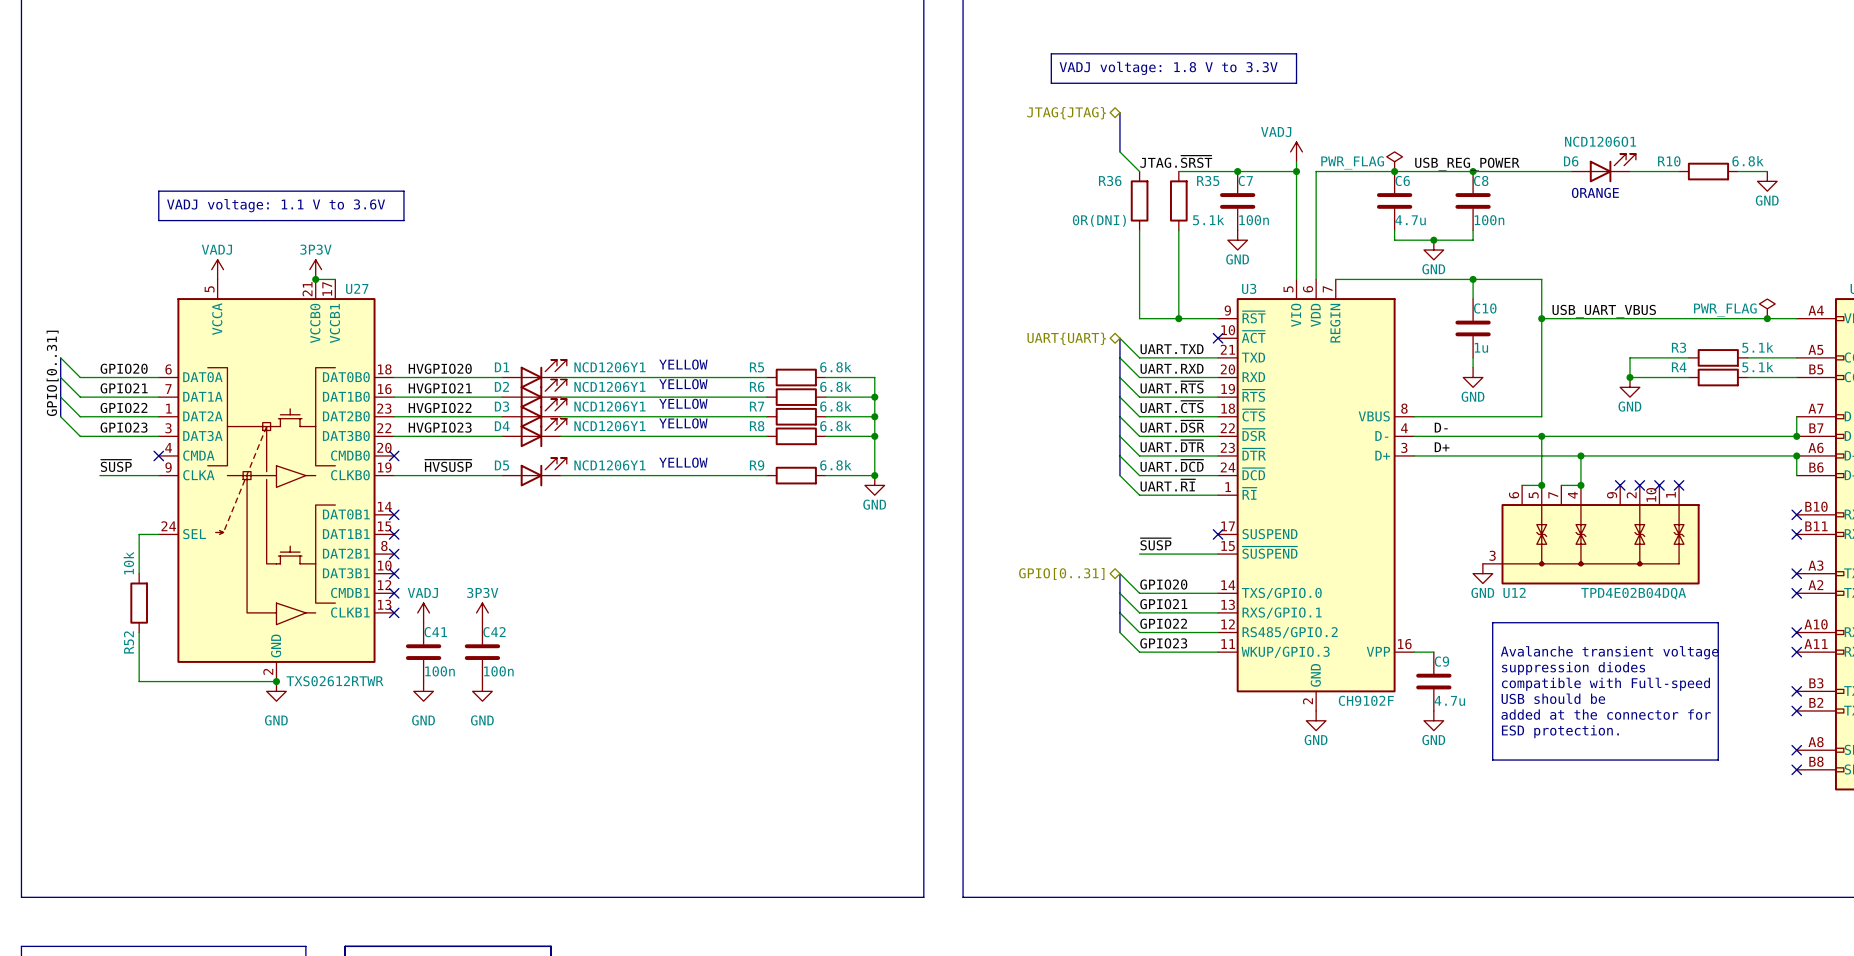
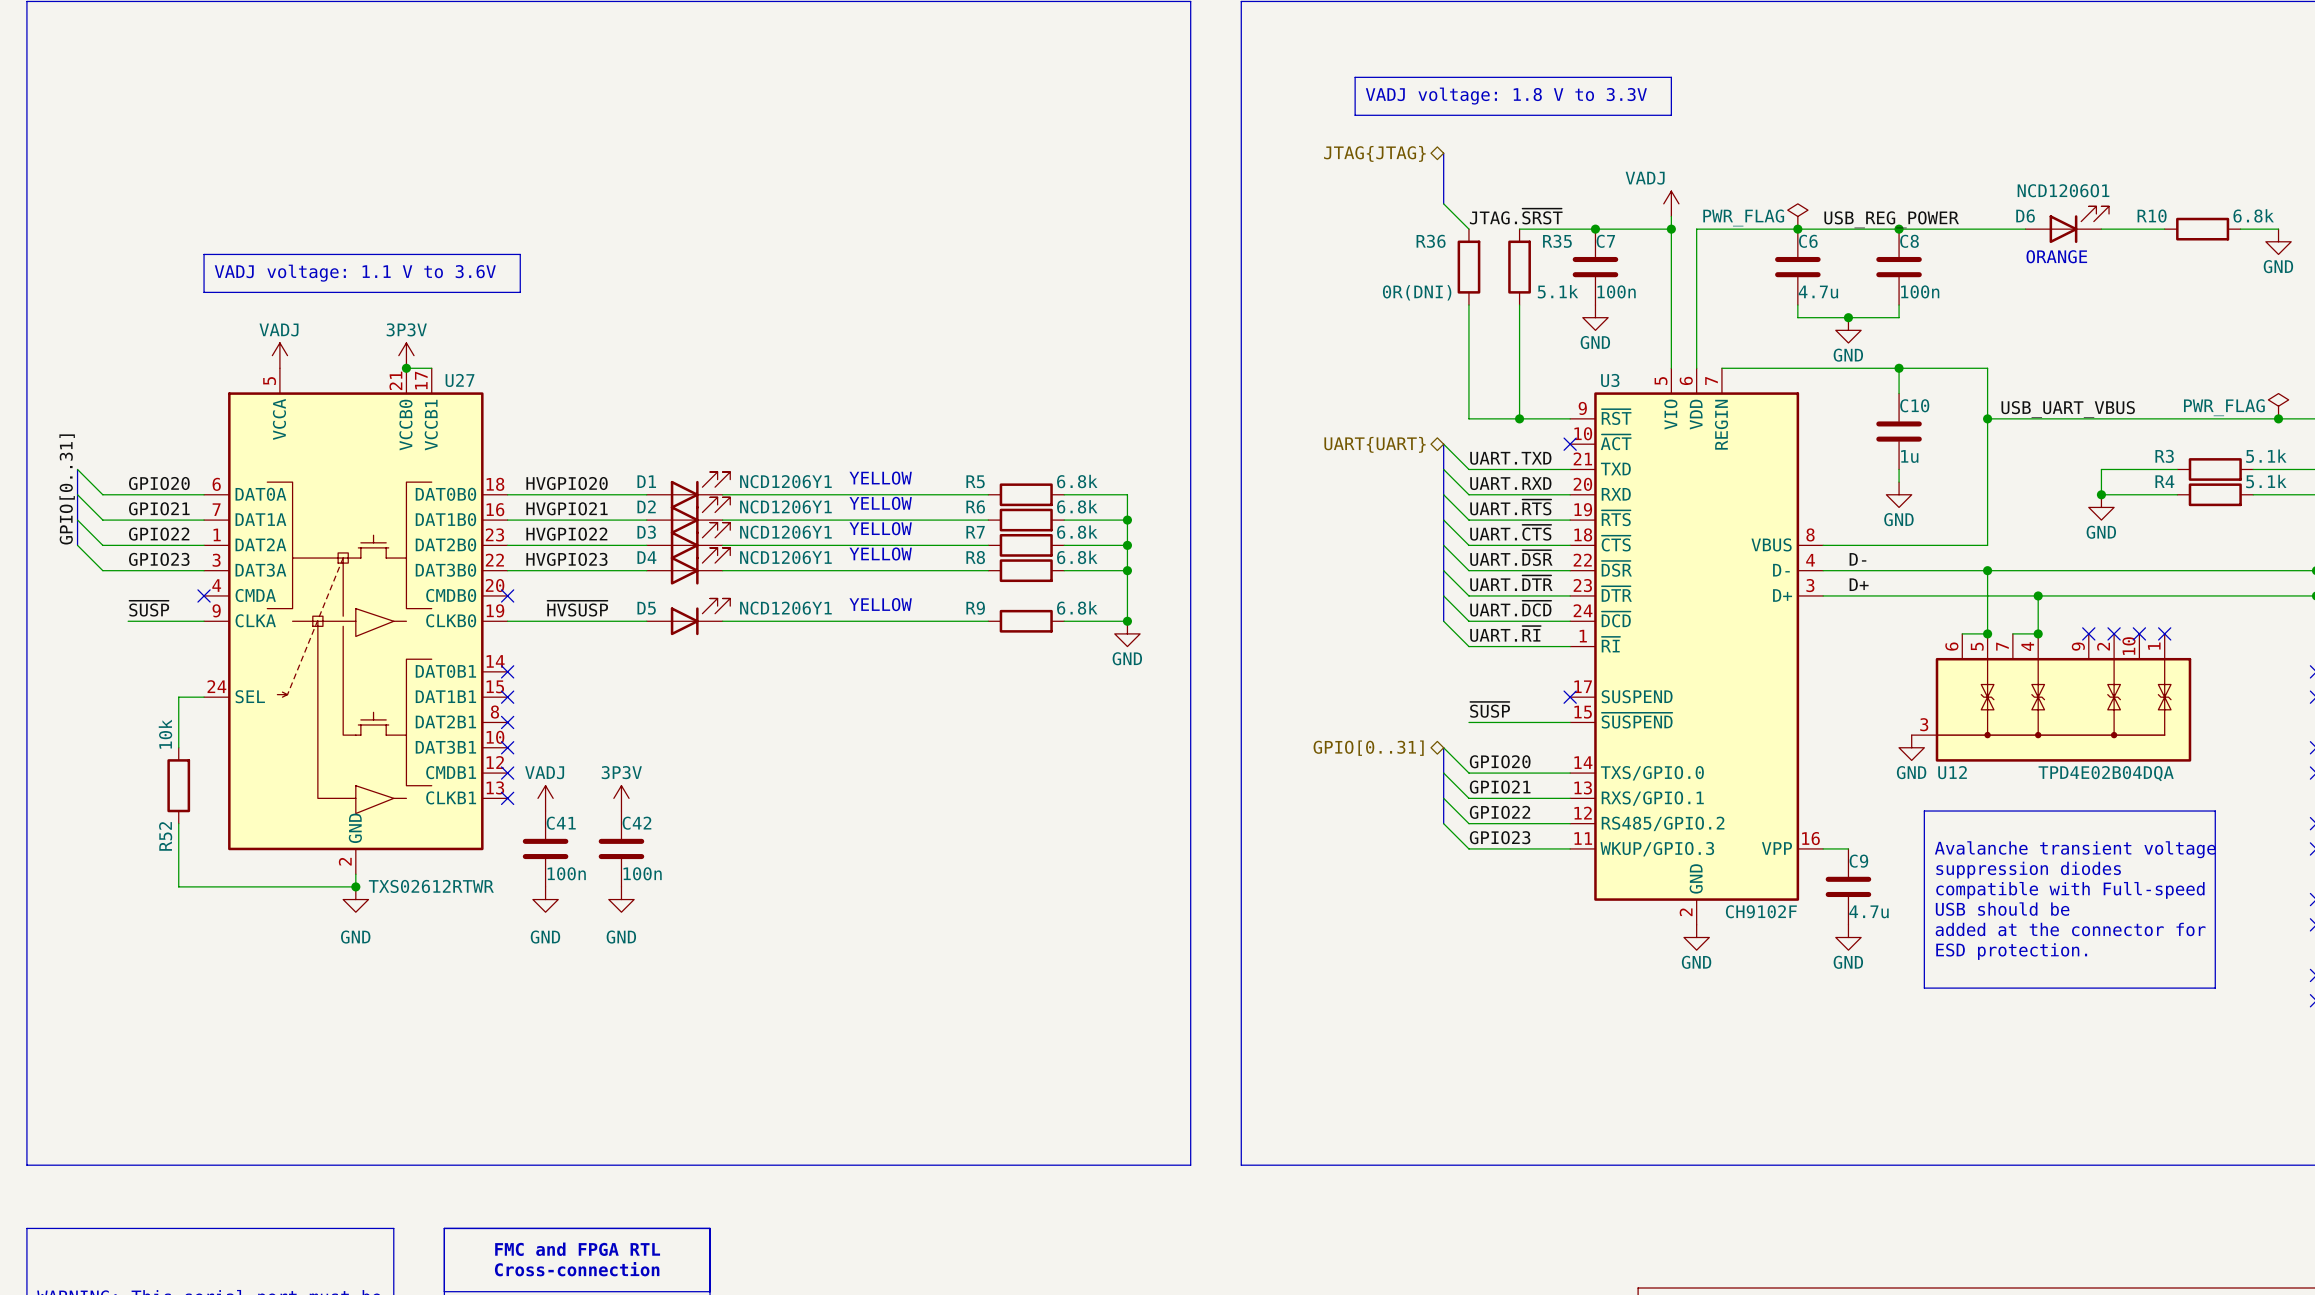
U27 symbol: [158, 279, 395, 682] -> [204, 368, 508, 875]

